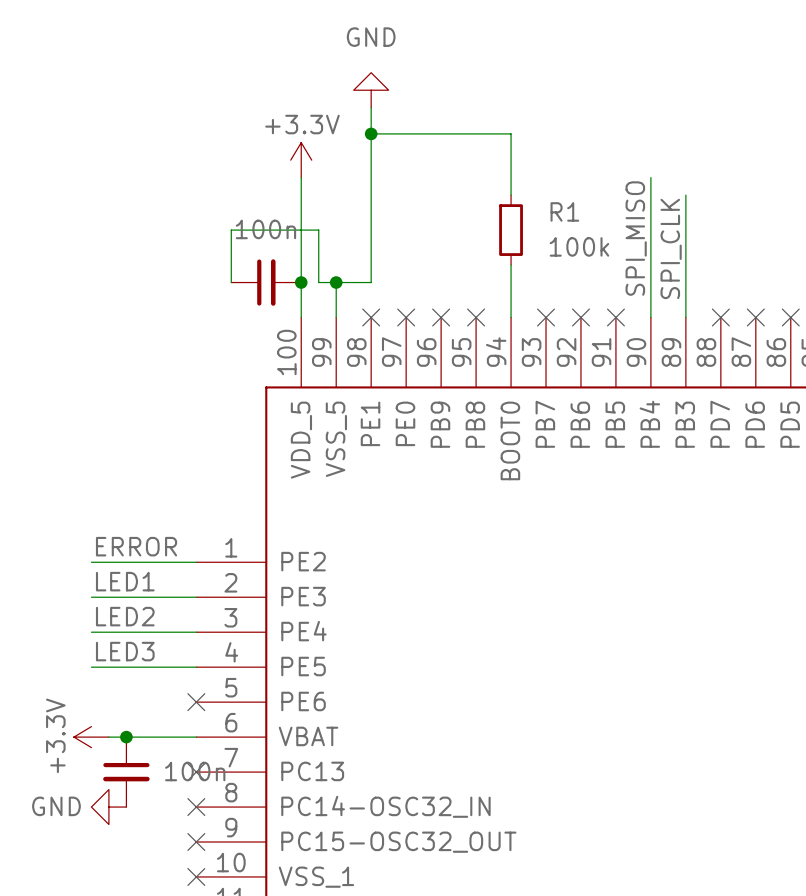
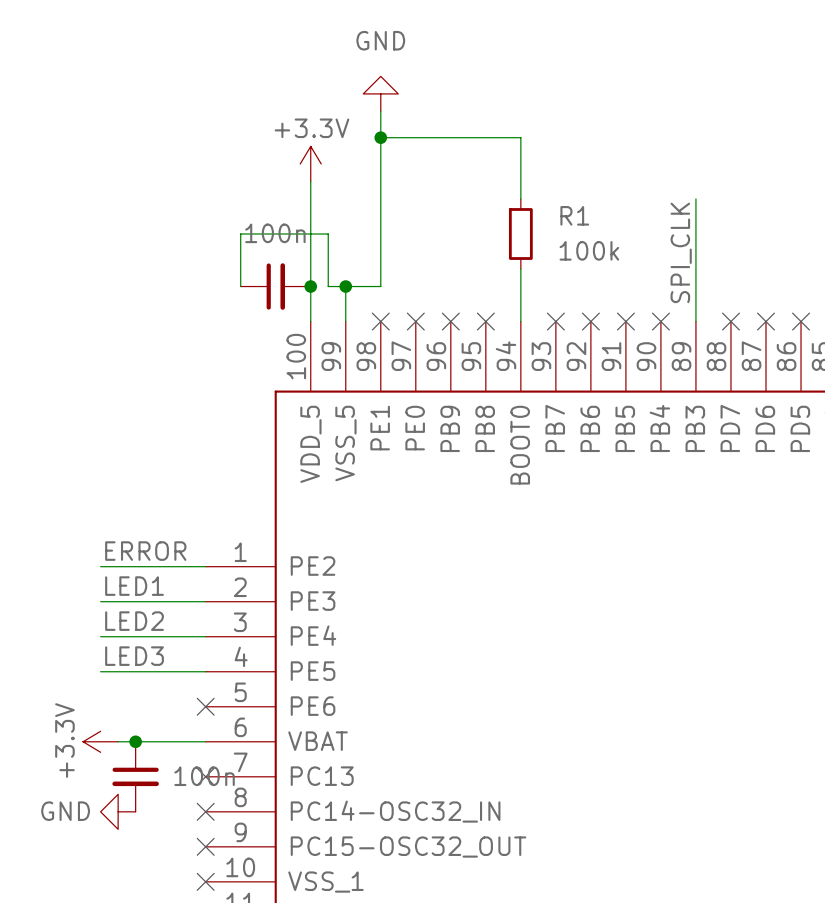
wire: (650, 177) (650, 317) -> none
label: SPI_MISO (636, 238) -> none
no-connect mark: none -> (660, 321)

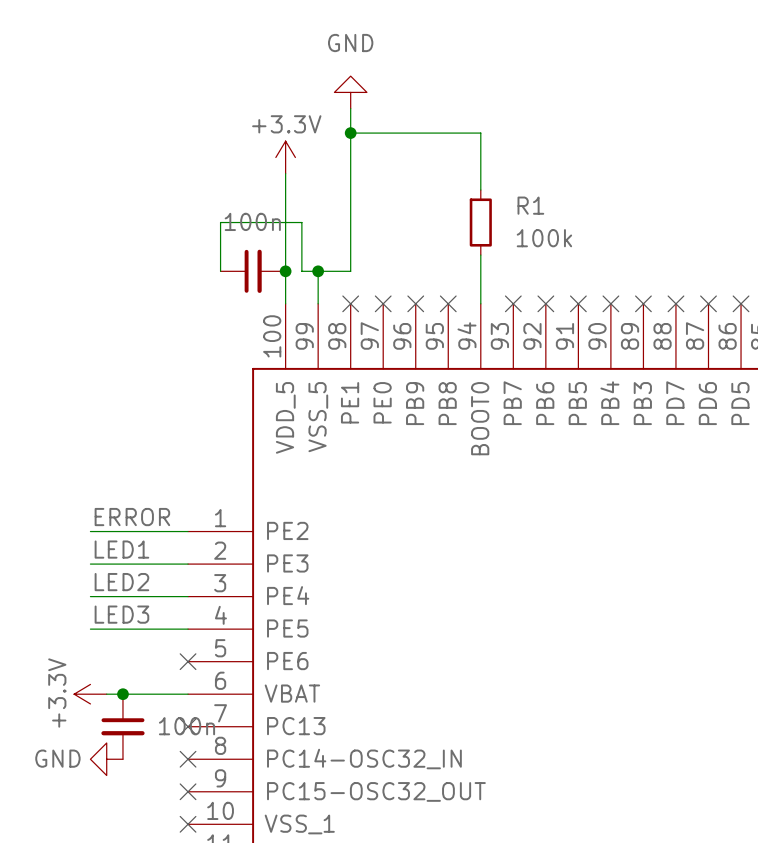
wire: (695, 198) (695, 321) -> none
label: SPI_CLK (681, 252) -> none
no-connect mark: none -> (643, 303)

